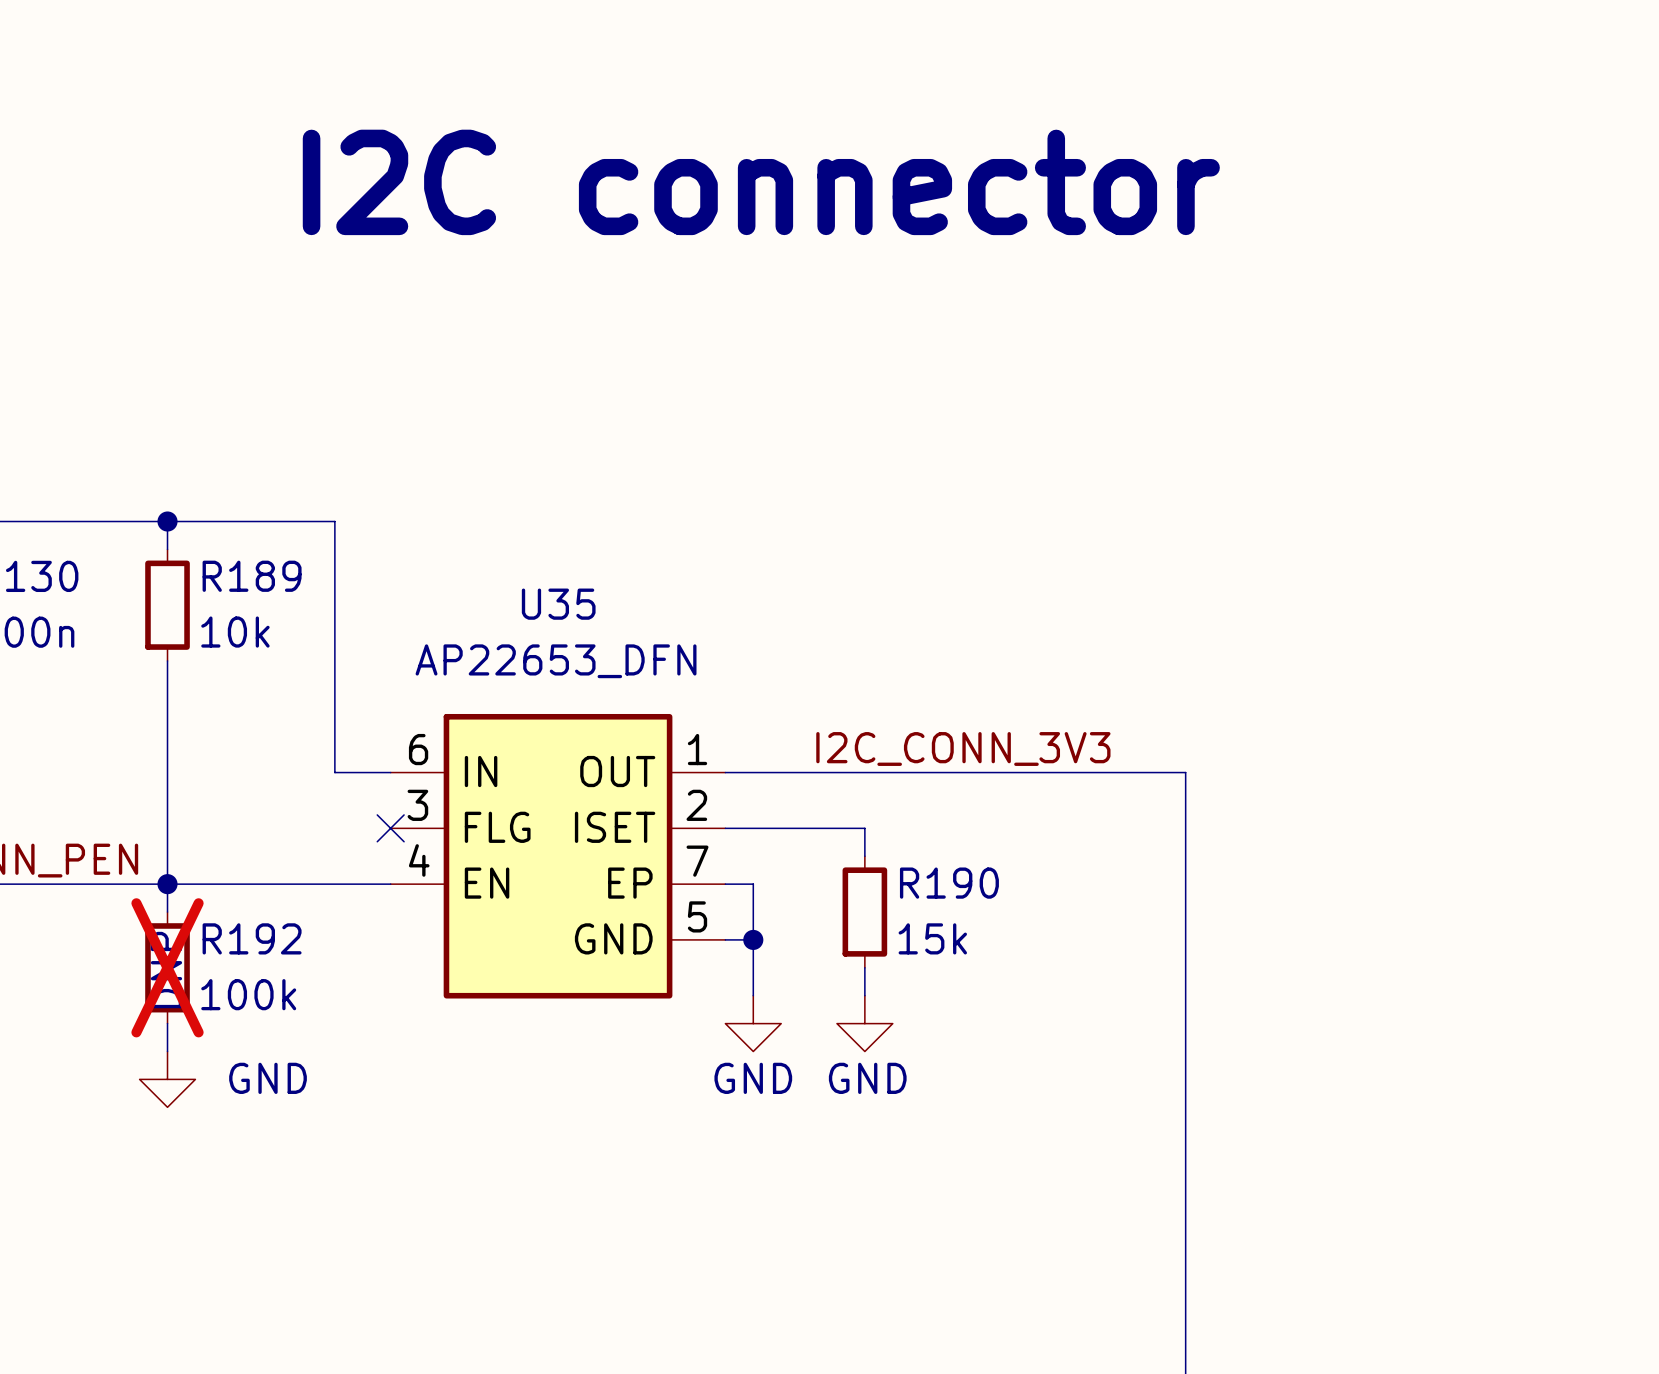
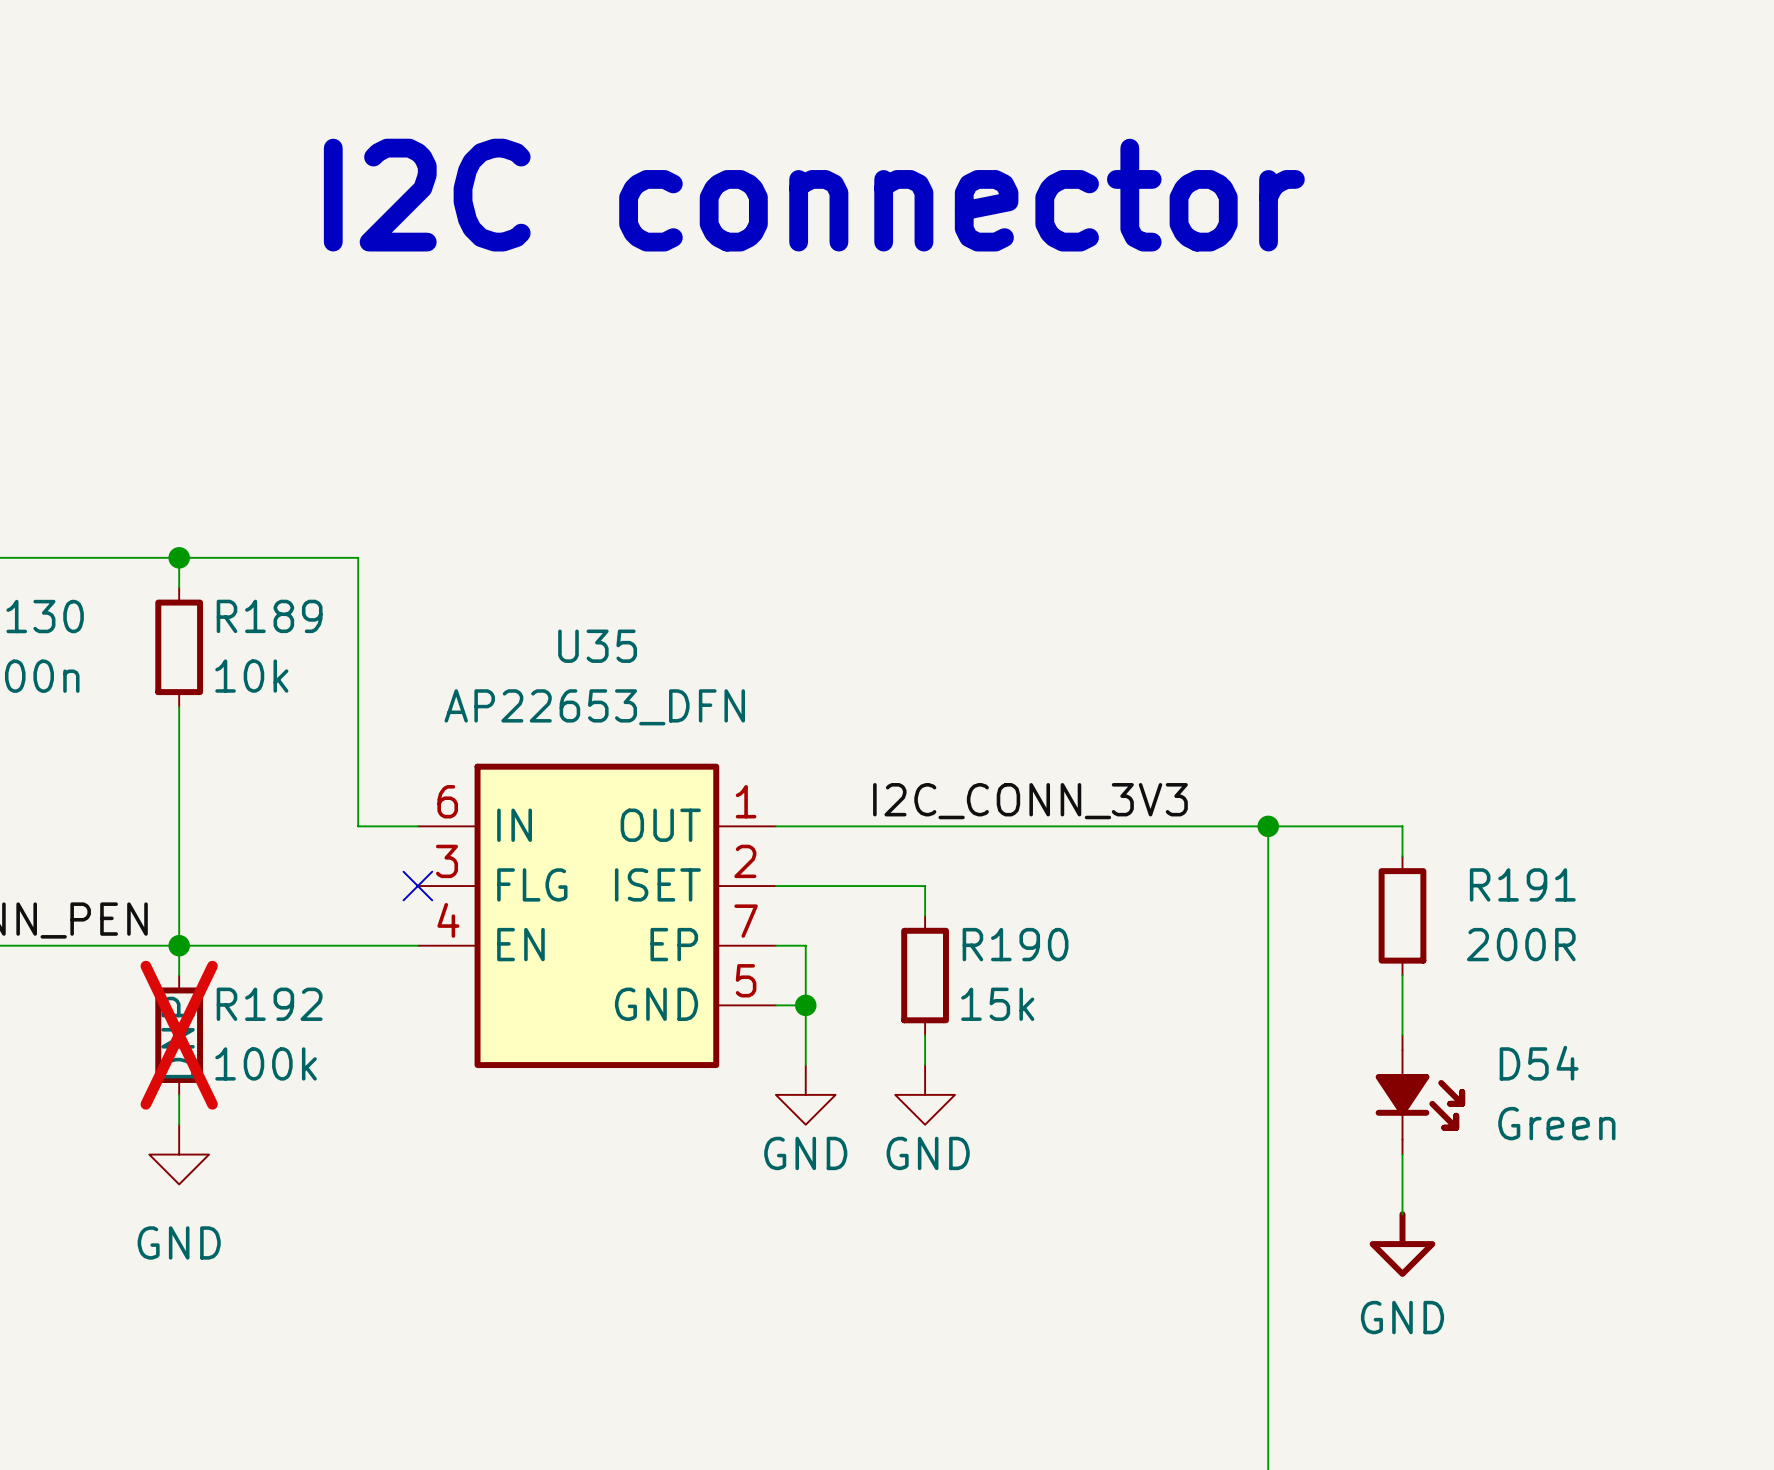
wire: none -> (1268, 826) (1402, 826) (1402, 856)
junction: none -> (1268, 826)
R191: none -> (1402, 915)
wire: none -> (1402, 975) (1402, 1035)
D54: none -> (1420, 1094)
power symbol text position: GND (268, 1078) -> GND (179, 1242)
wire: none -> (1402, 1154) (1402, 1214)
power symbol: none -> GND (1402, 1244)

